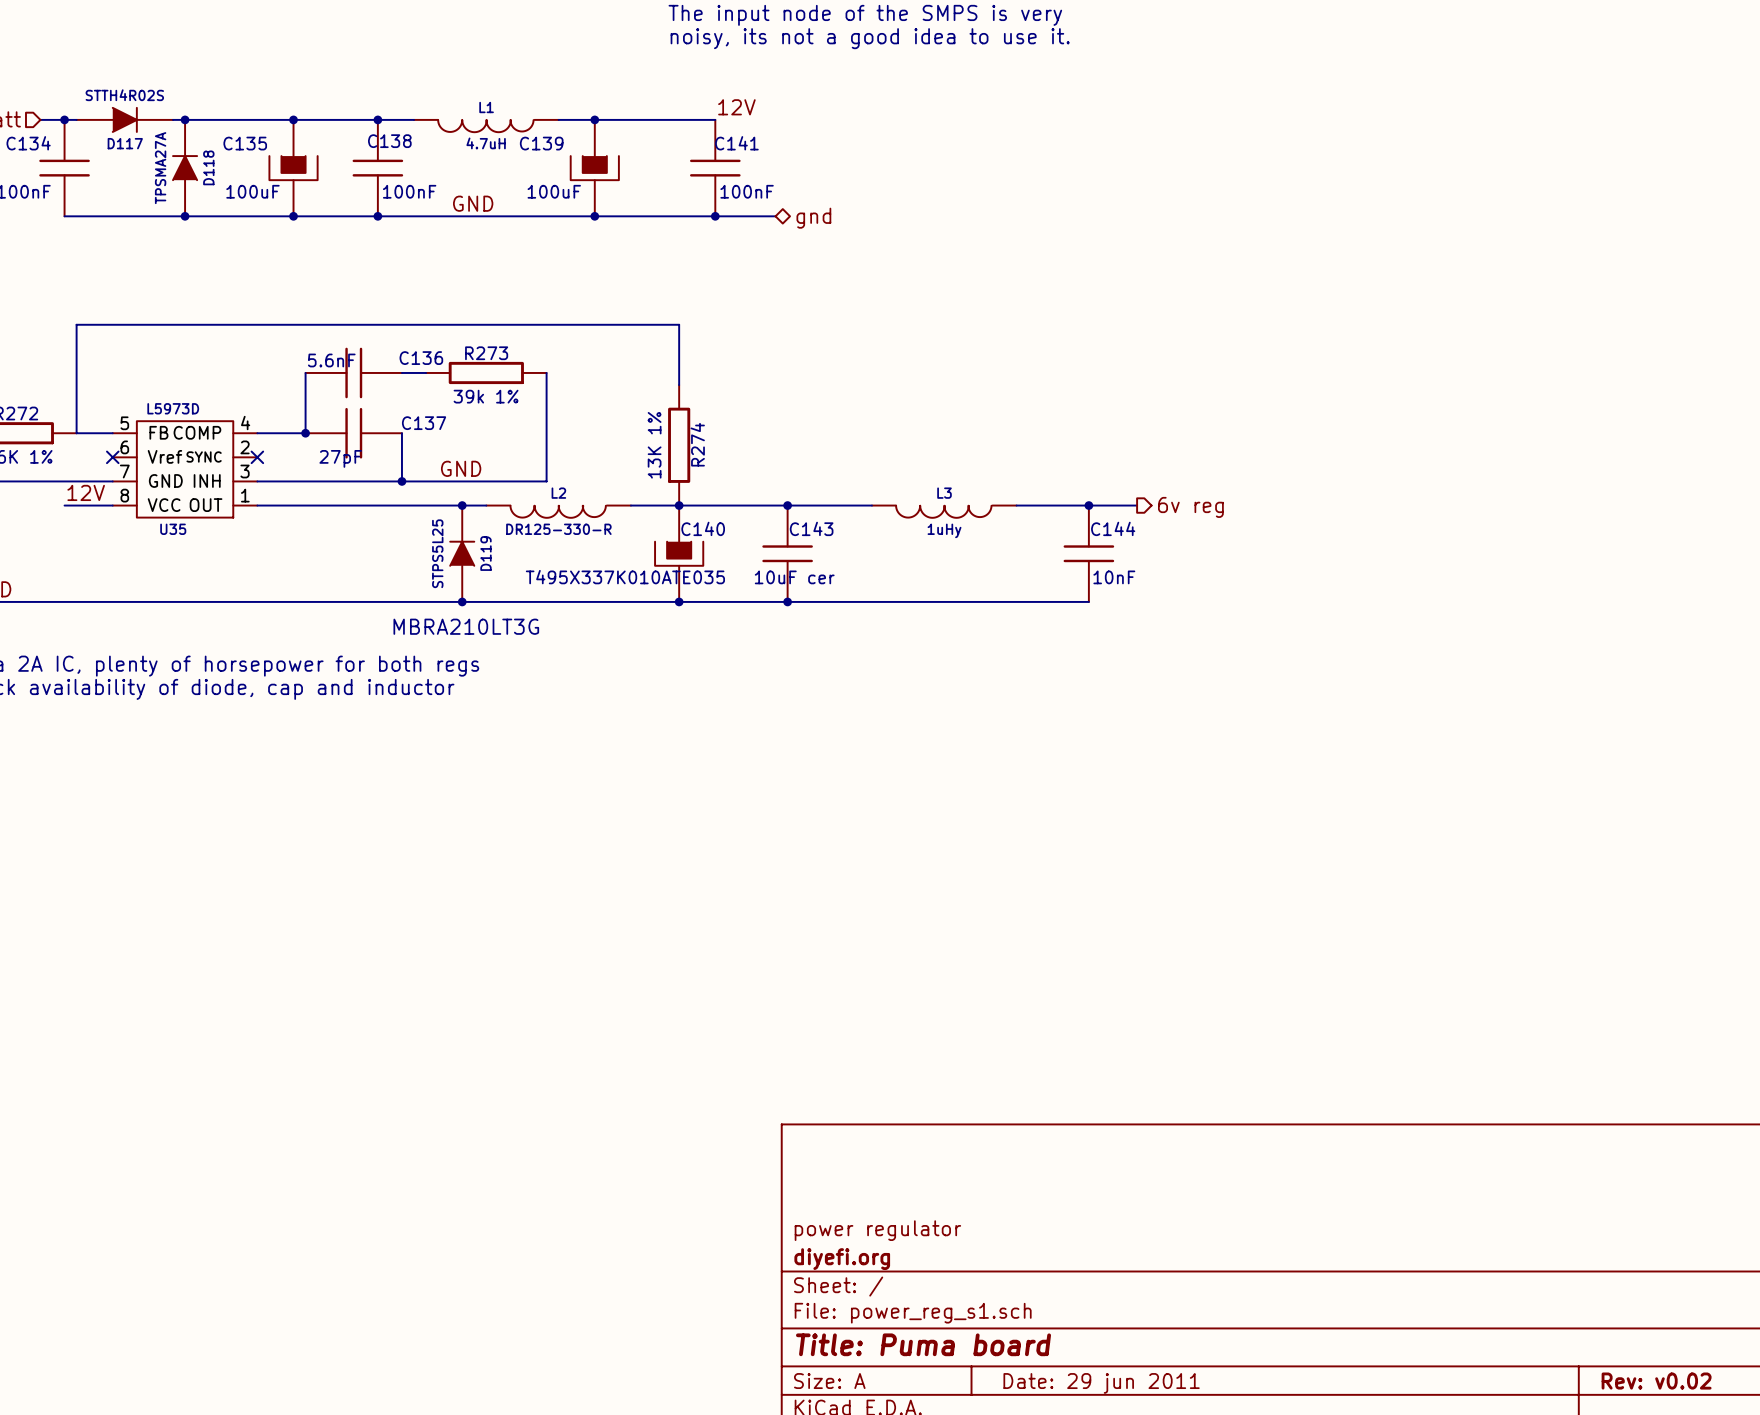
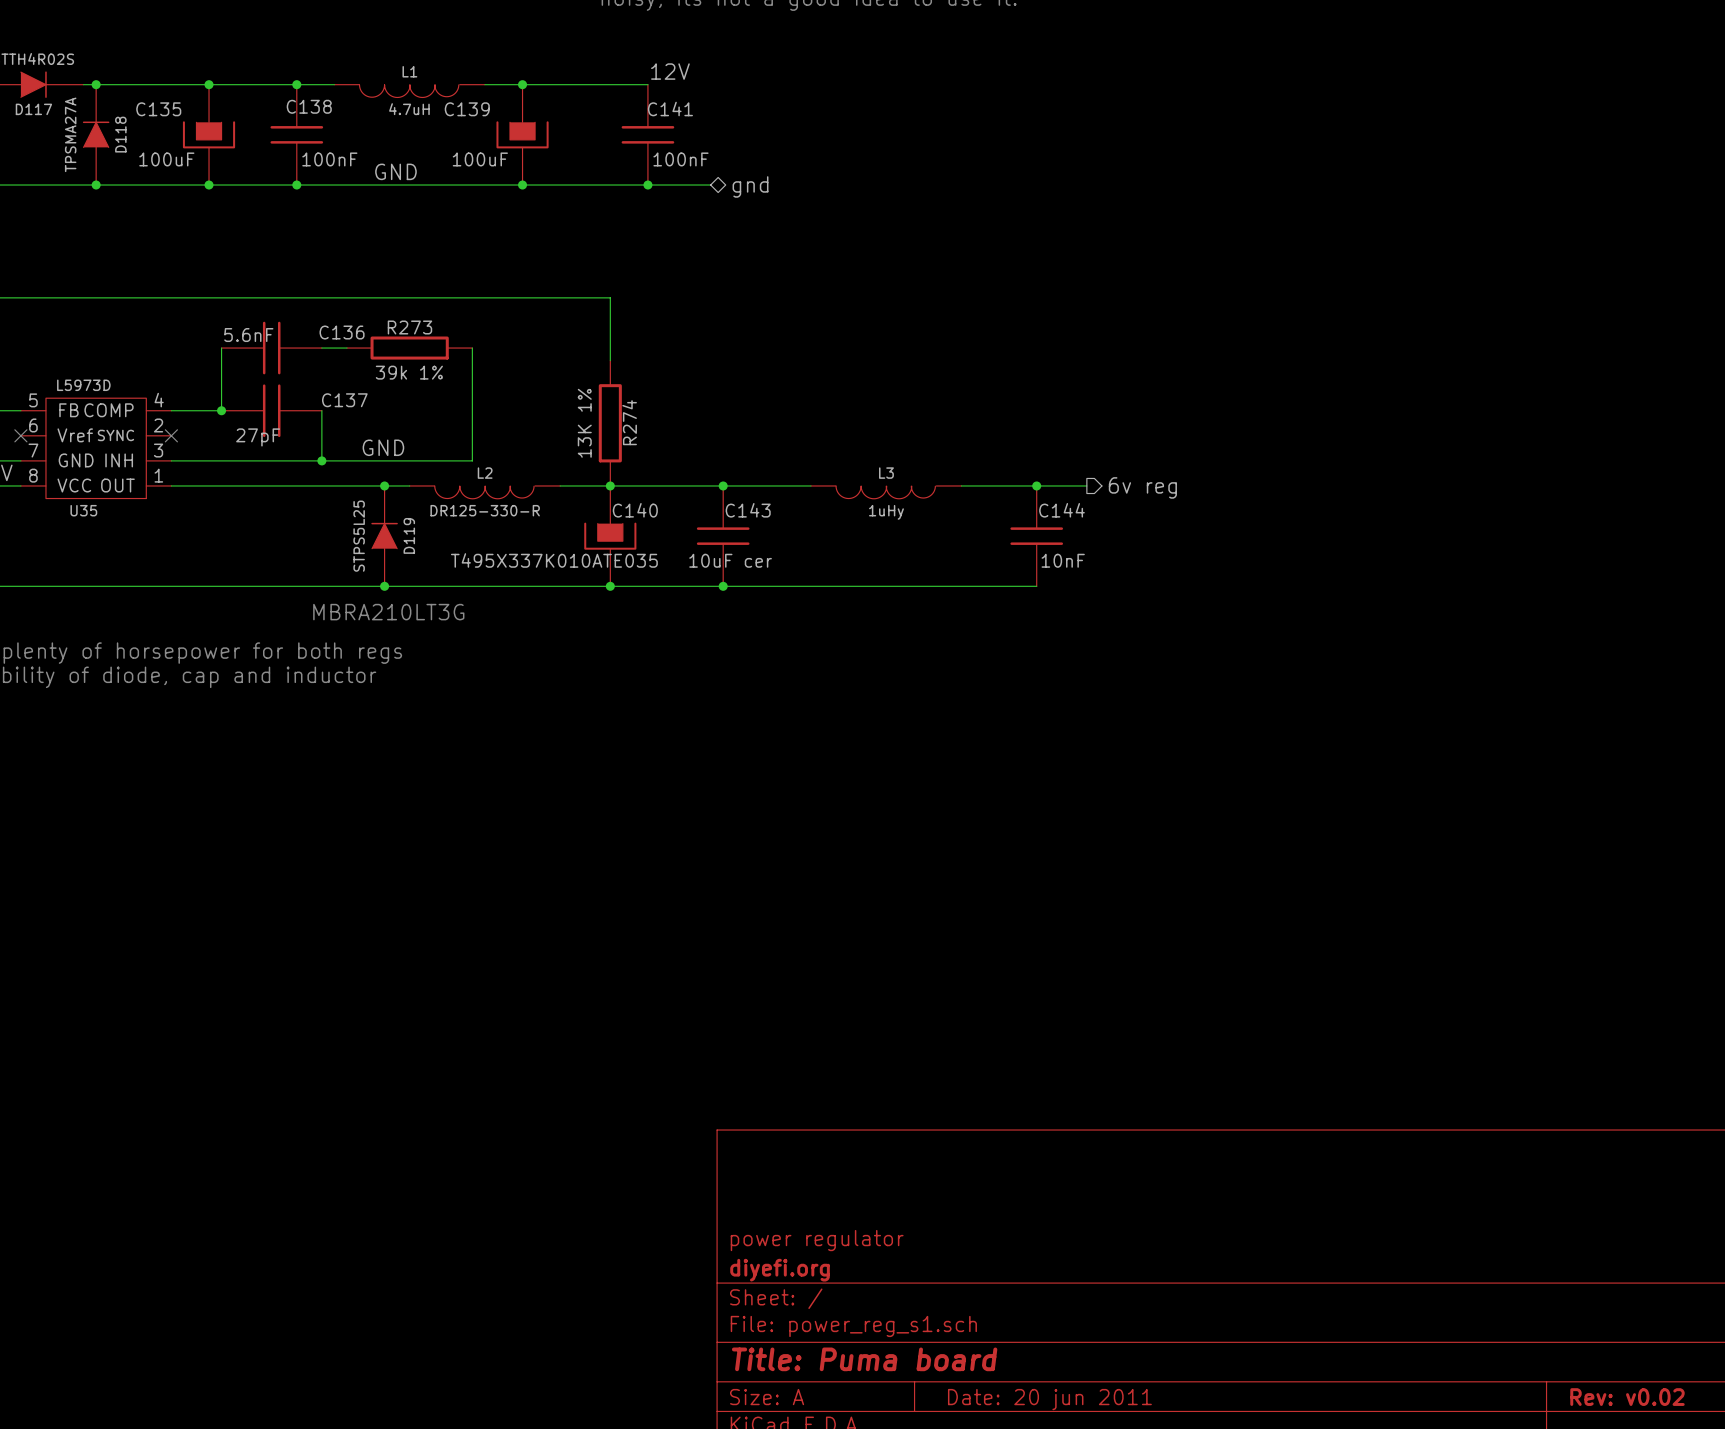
title block: Date: 29 jun 2011 (1101, 1383) -> Date: 20 jun 2011 (1049, 1399)

